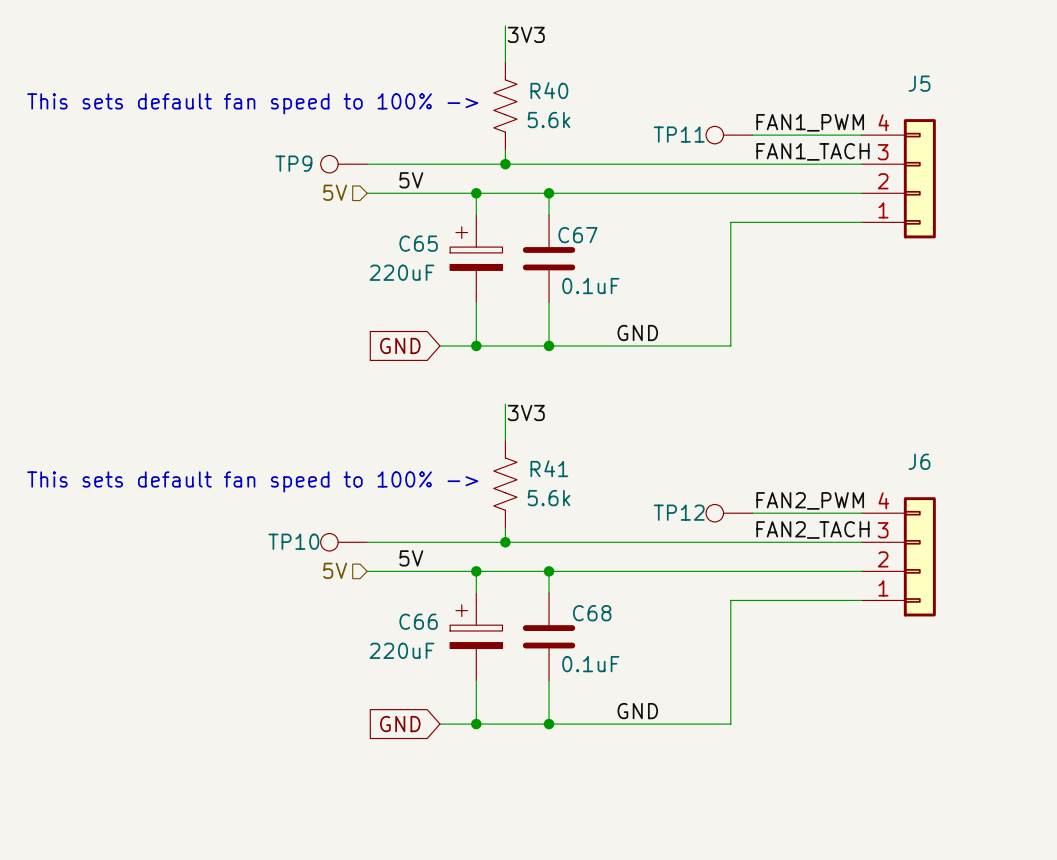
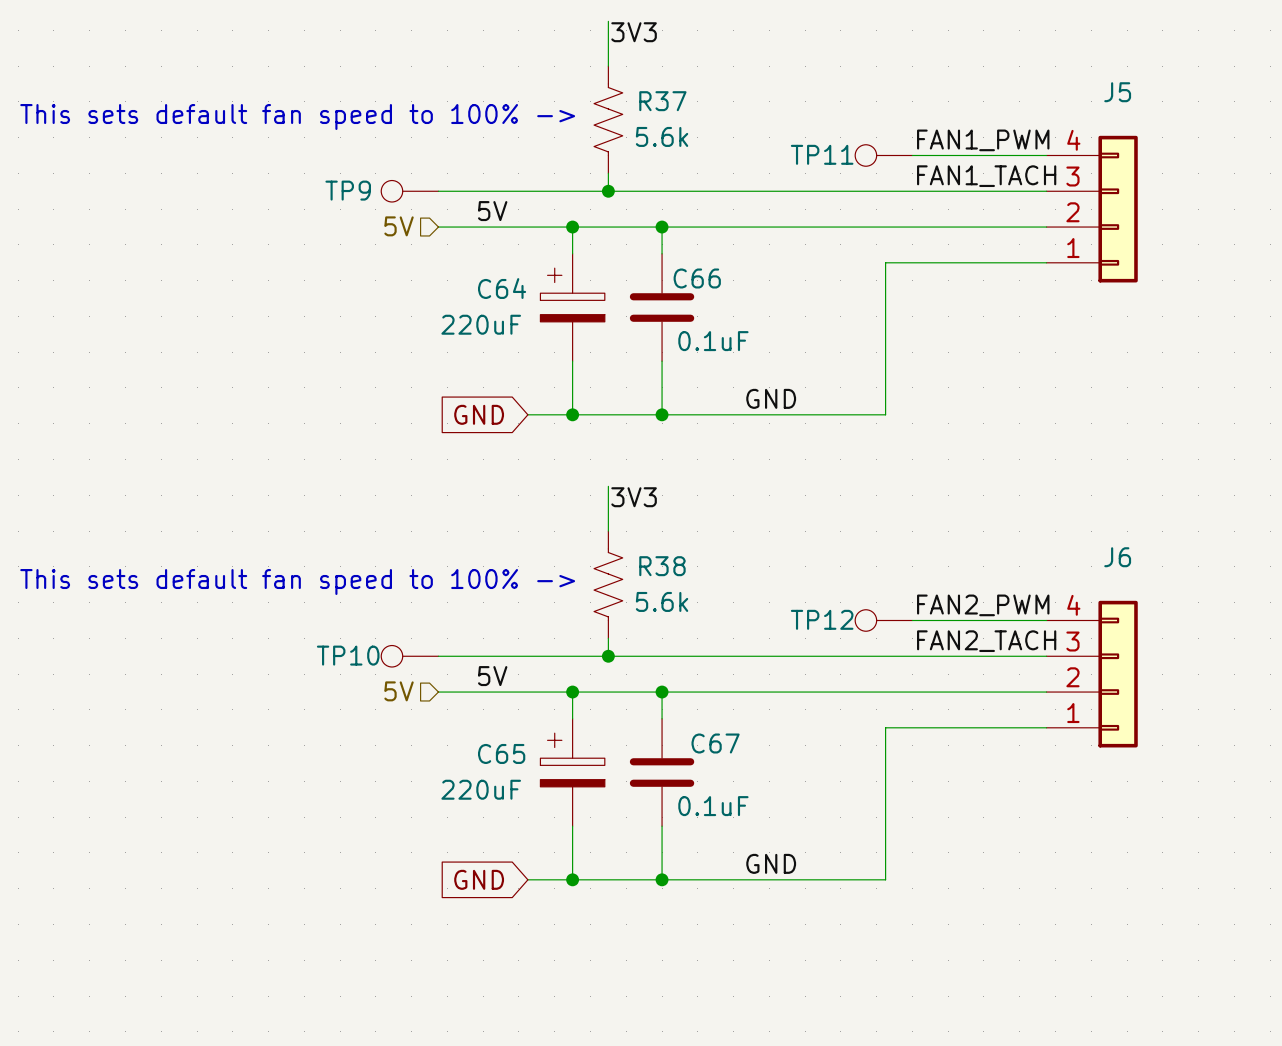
R40 name: R40 (549, 90) -> R37 (662, 101)
C67 name: C67 (577, 235) -> C66 (697, 278)
C65 name: C65 (418, 243) -> C64 (502, 288)
R41 name: R41 (549, 468) -> R38 (662, 566)
C68 name: C68 (592, 613) -> C67 (715, 743)
C66 name: C66 (418, 621) -> C65 (501, 753)

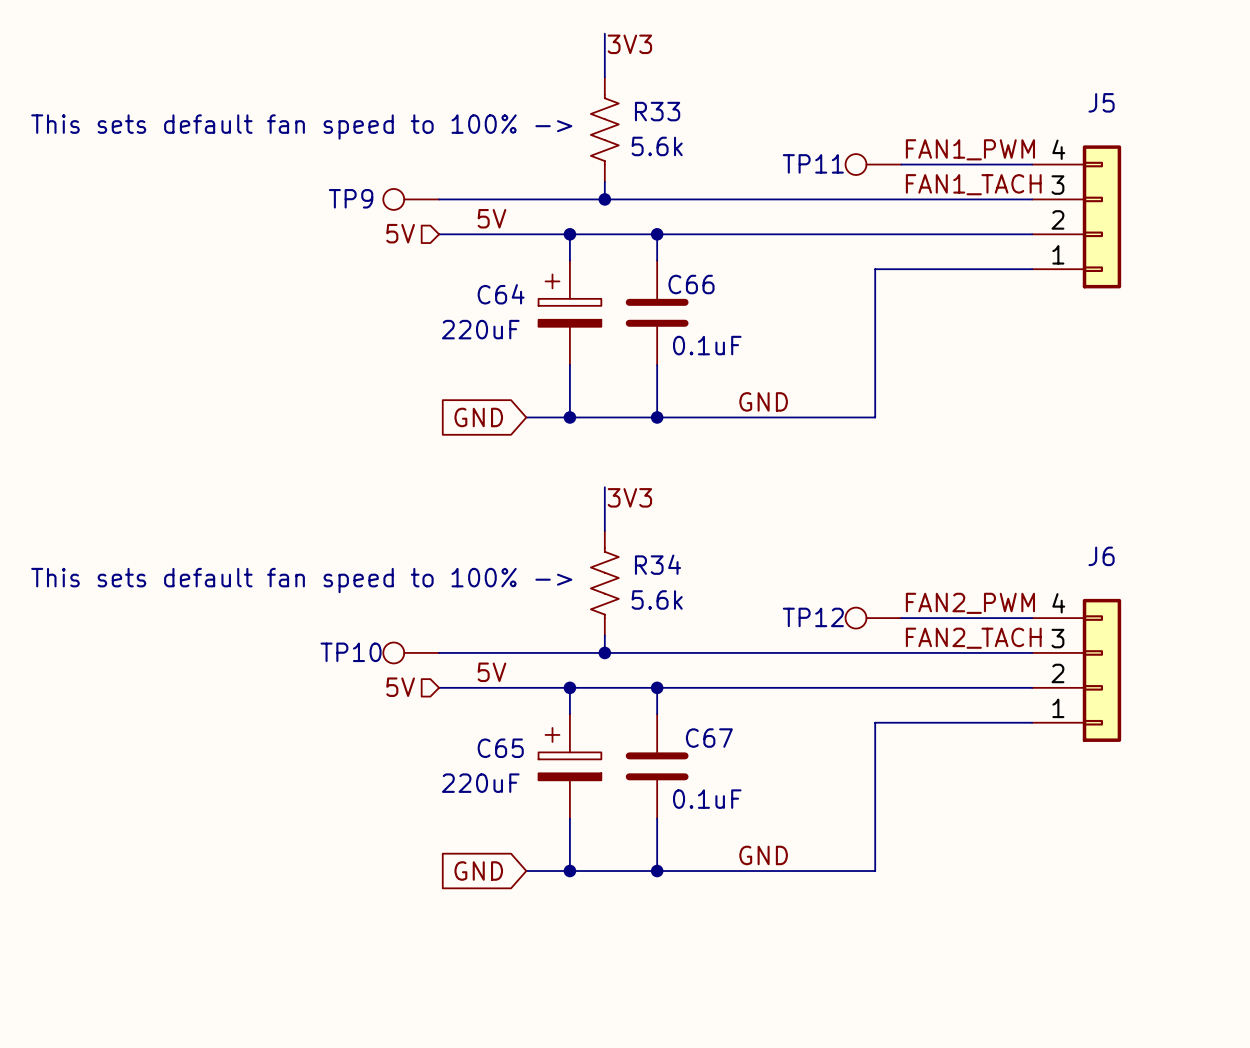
R37 name: R37 (662, 101) -> R33 (657, 111)
R38 name: R38 (662, 566) -> R34 (657, 564)

